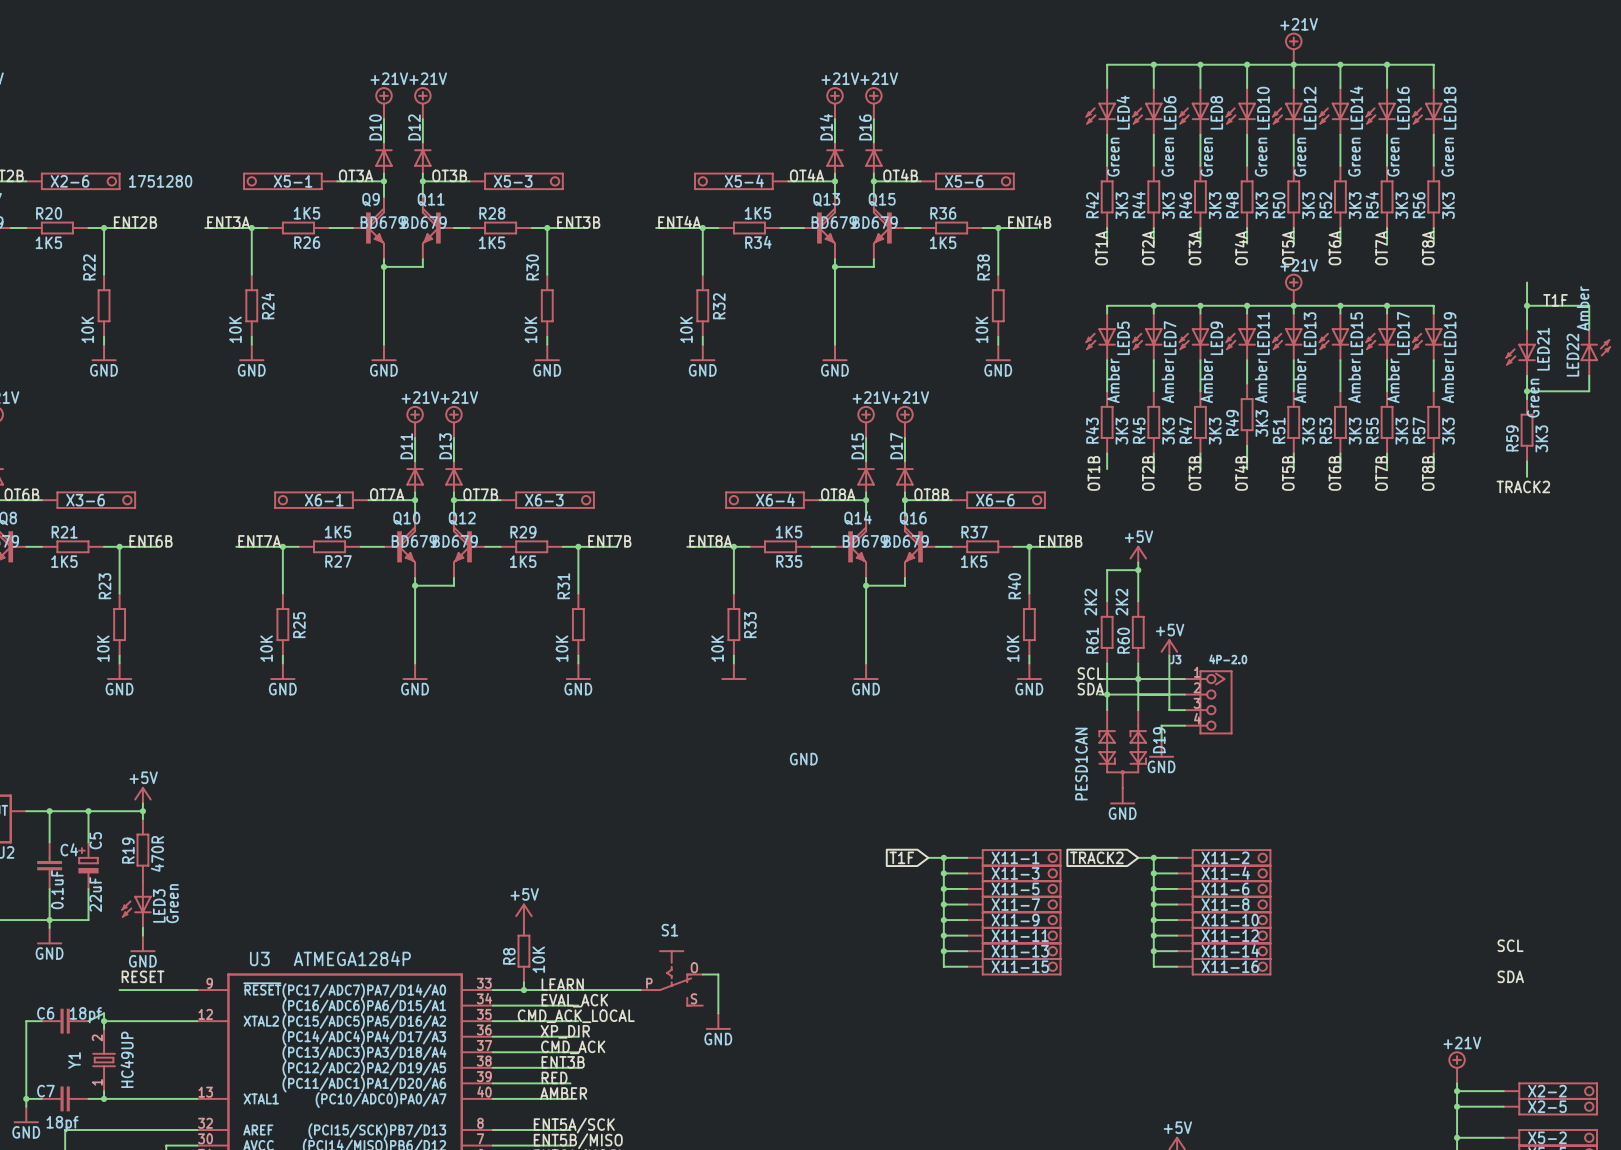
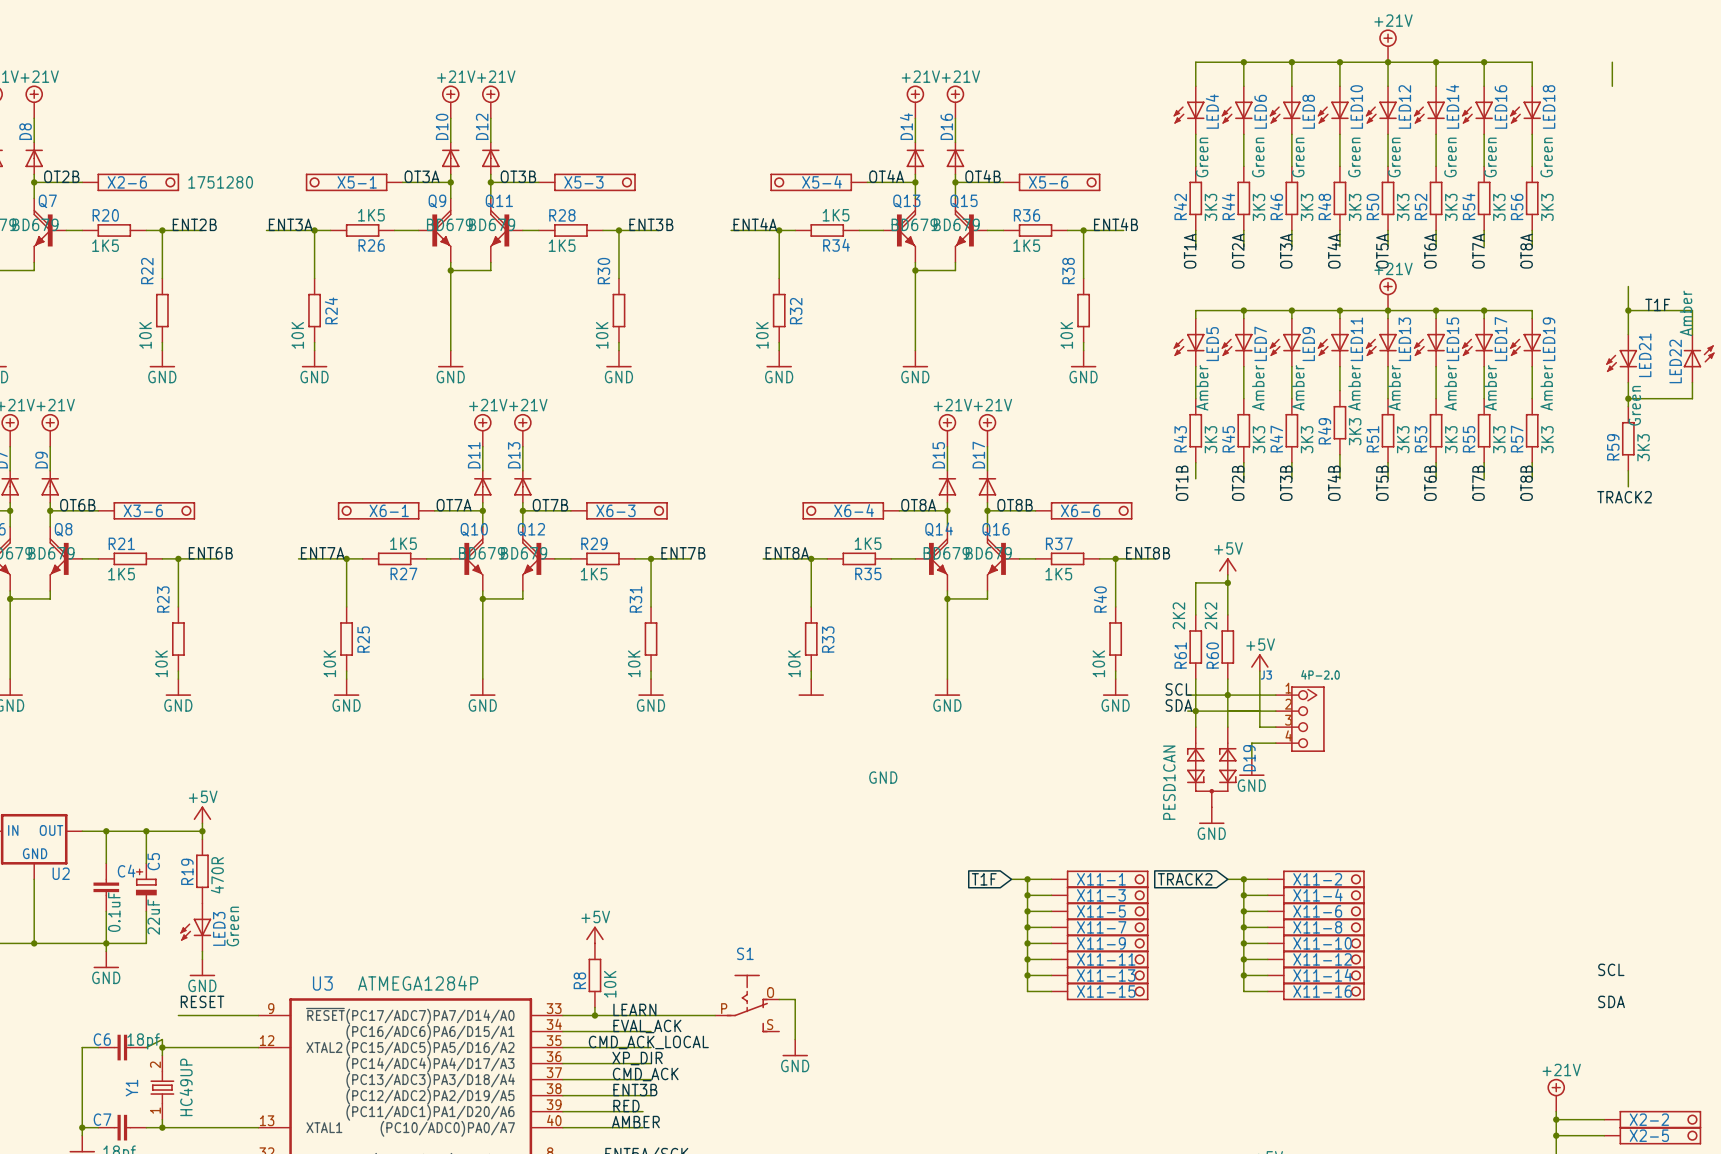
wire: none -> (1612, 62) (1612, 86)

